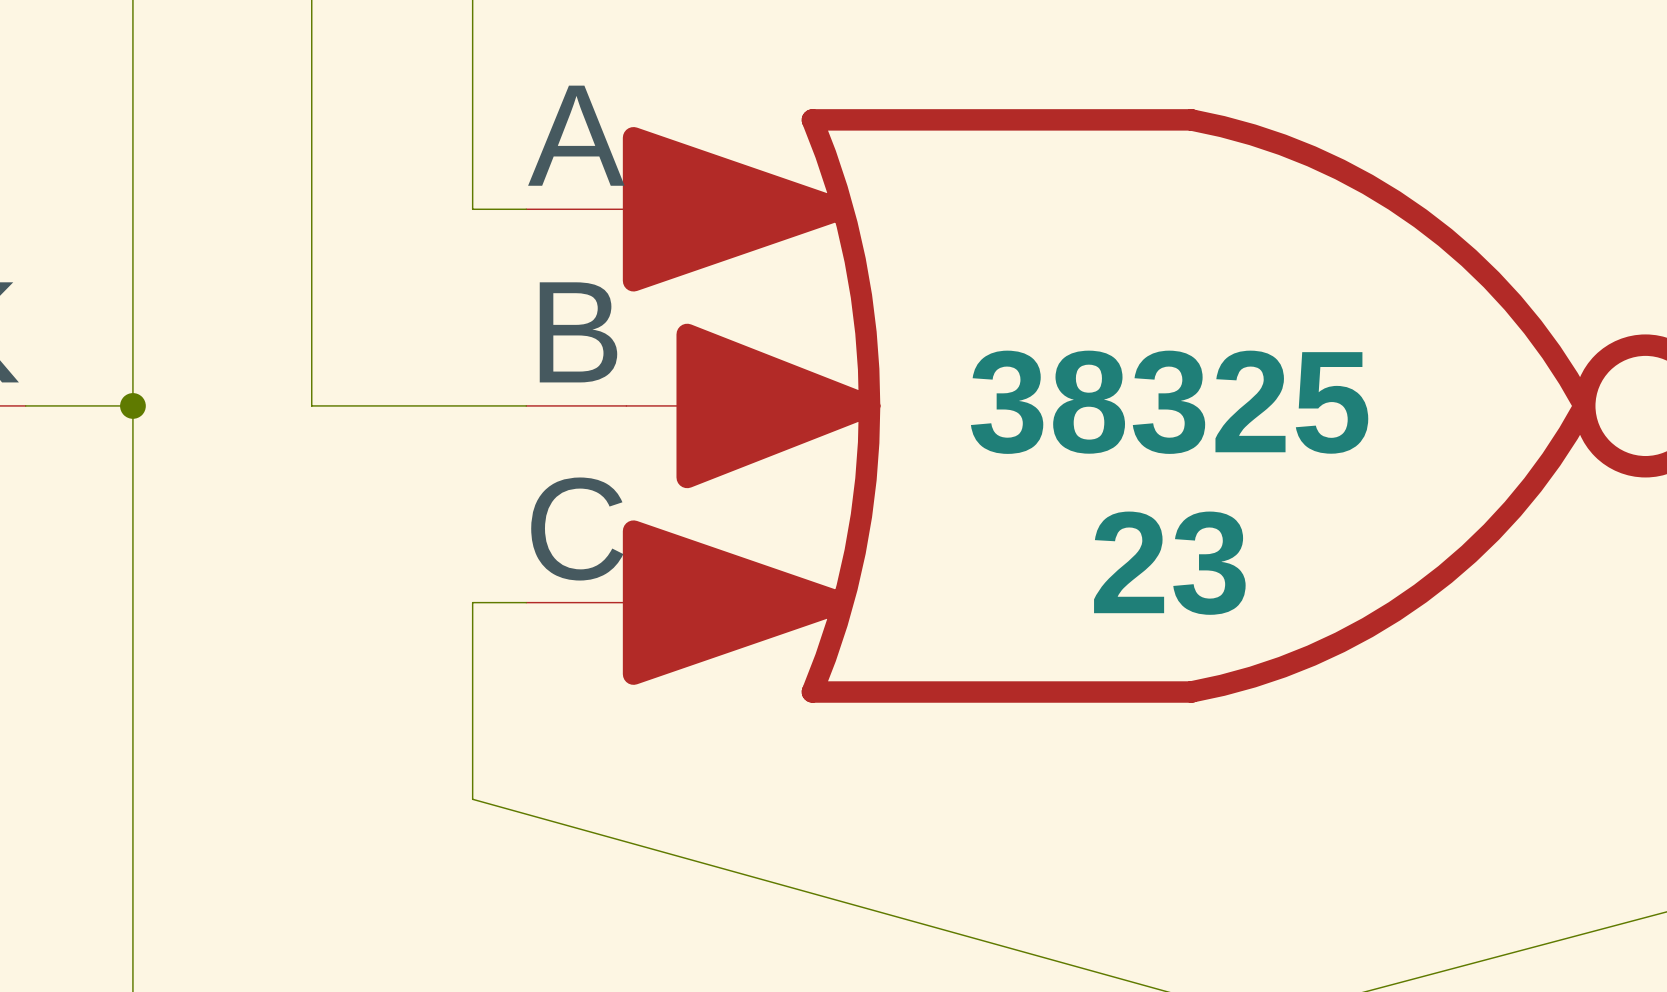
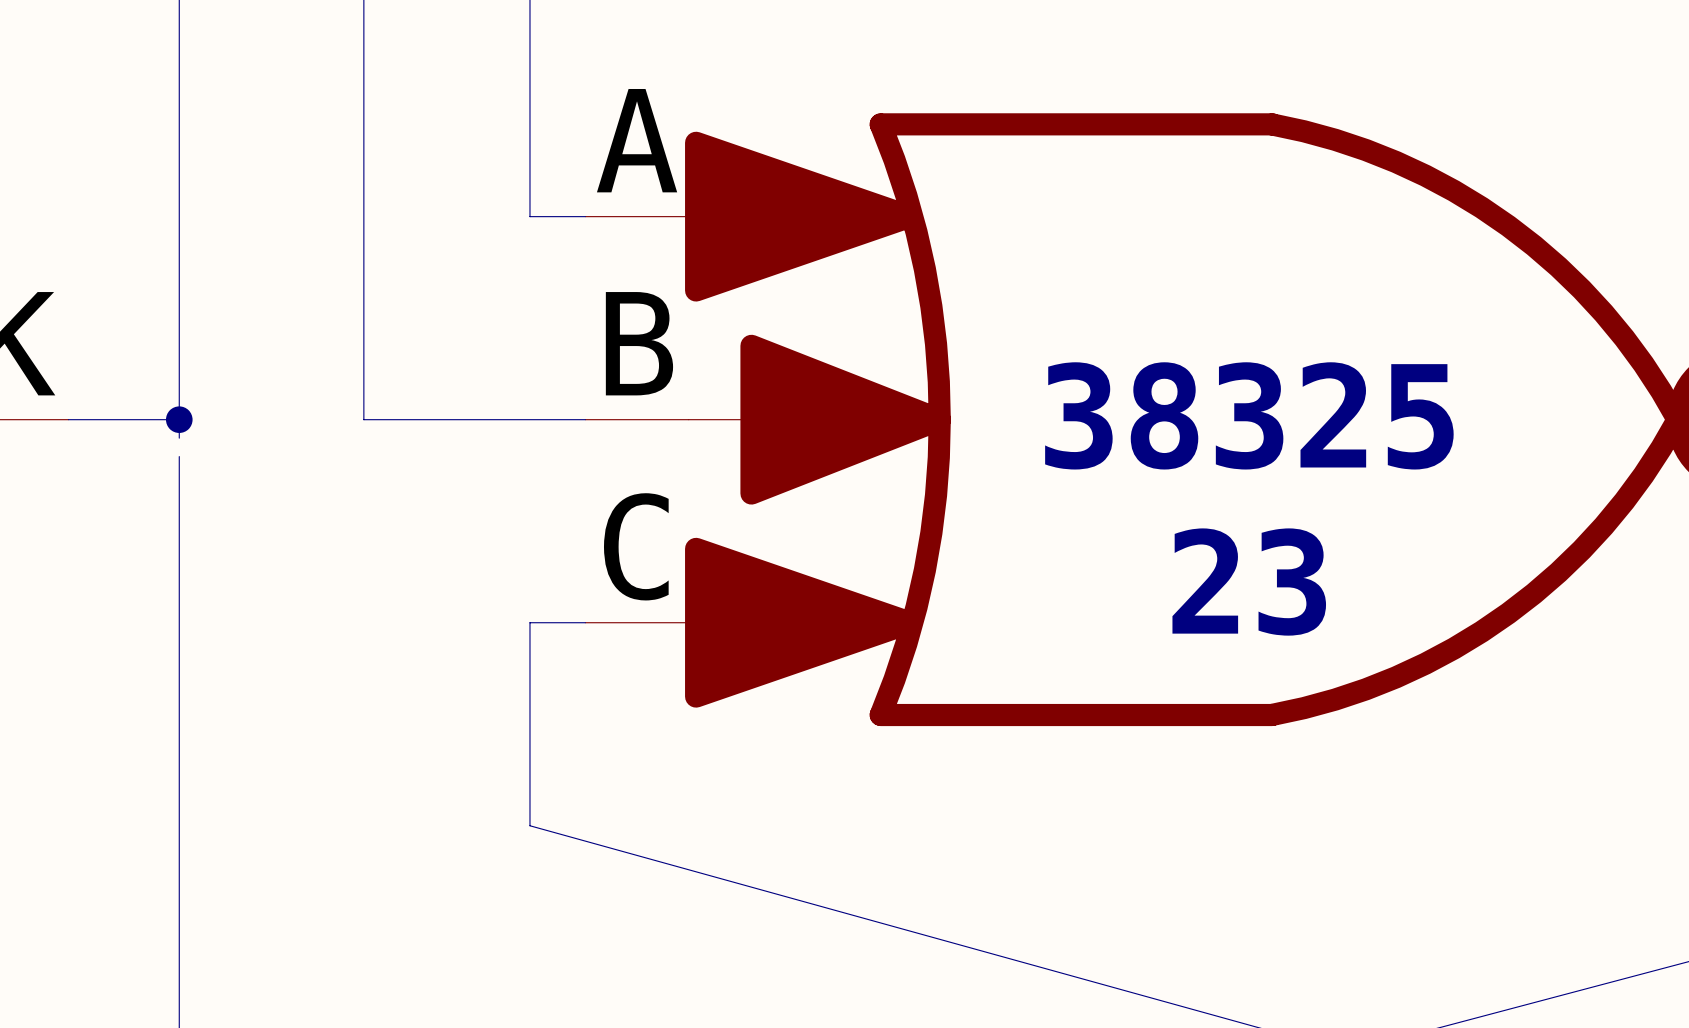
wire: (132, 423) (132, 441) -> none

